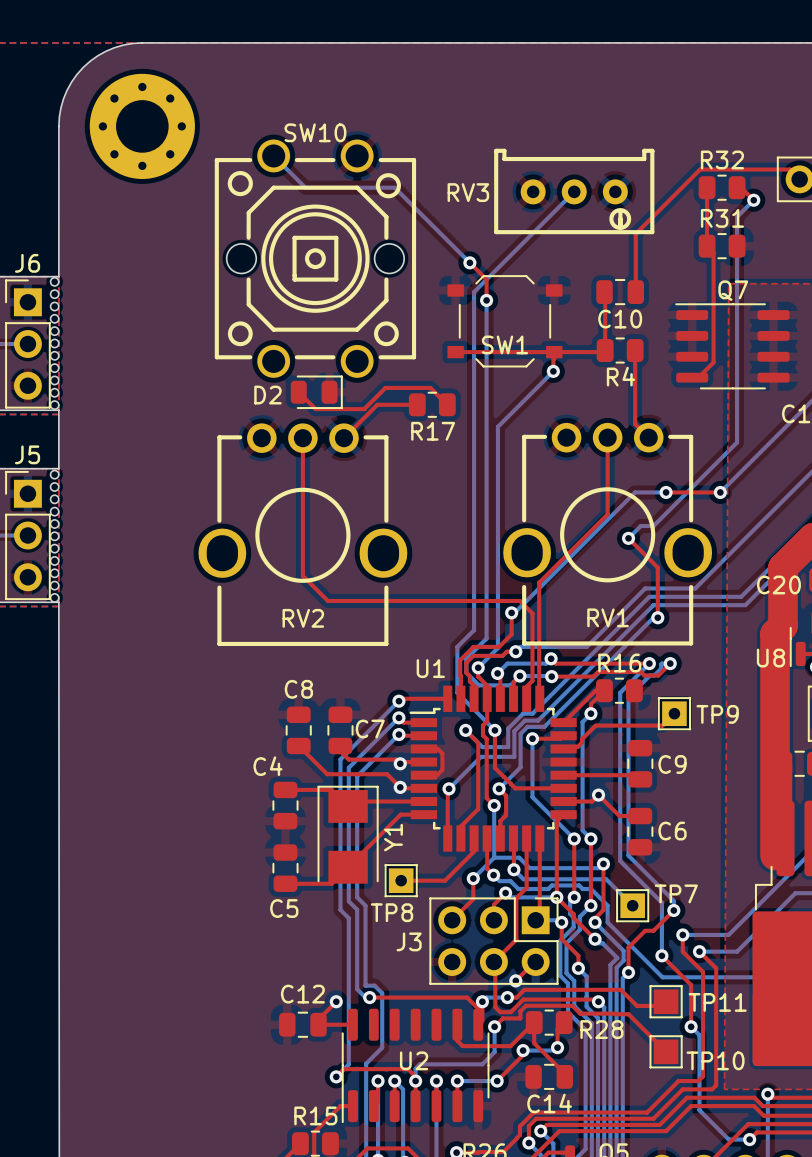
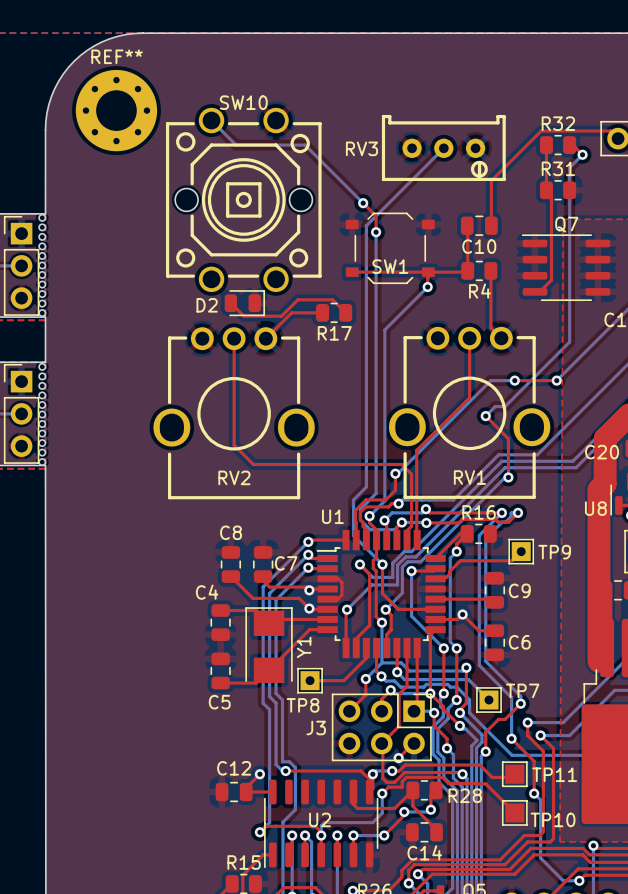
board edge: (184, 42) (132, 43) (114, 47) (97, 55) (83, 67) (67, 90) (60, 107) (58, 126) -> (142, 33) (117, 36) (101, 42) (74, 61) (54, 88) (46, 113) (45, 130)
board edge: (58, 126) (58, 276) -> (45, 130) (45, 213)
part: (142, 126) -> none
REF**: none -> (116, 110)
J6 name: J6 (27, 263) -> none
J5 name: J5 (27, 454) -> none

